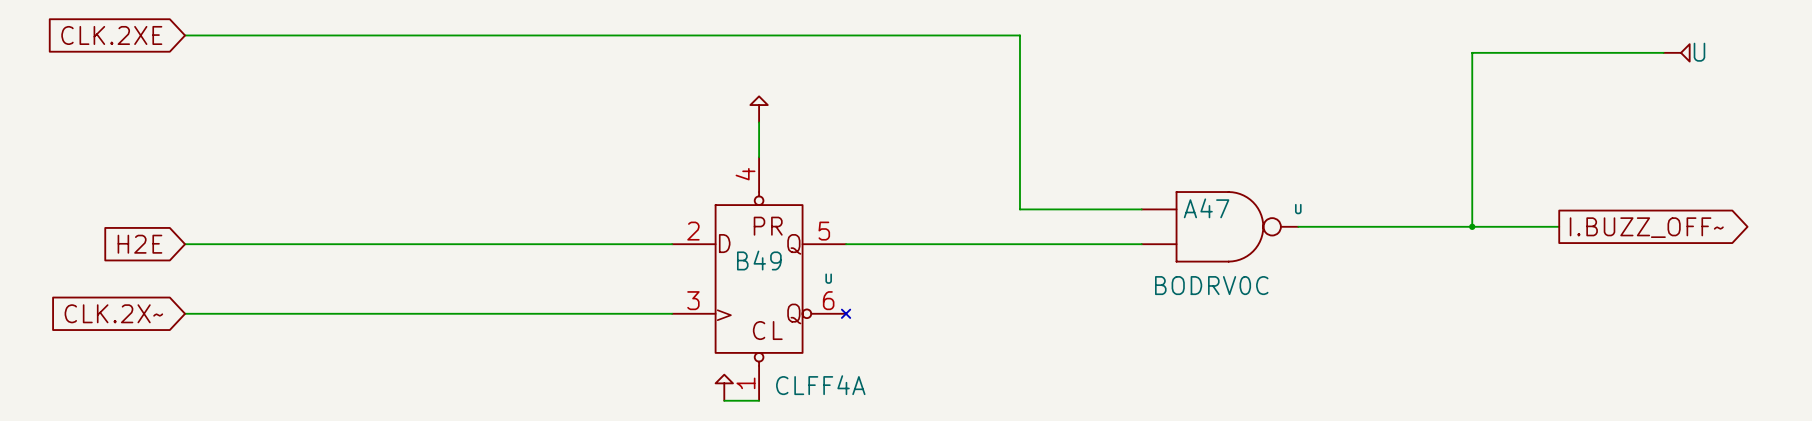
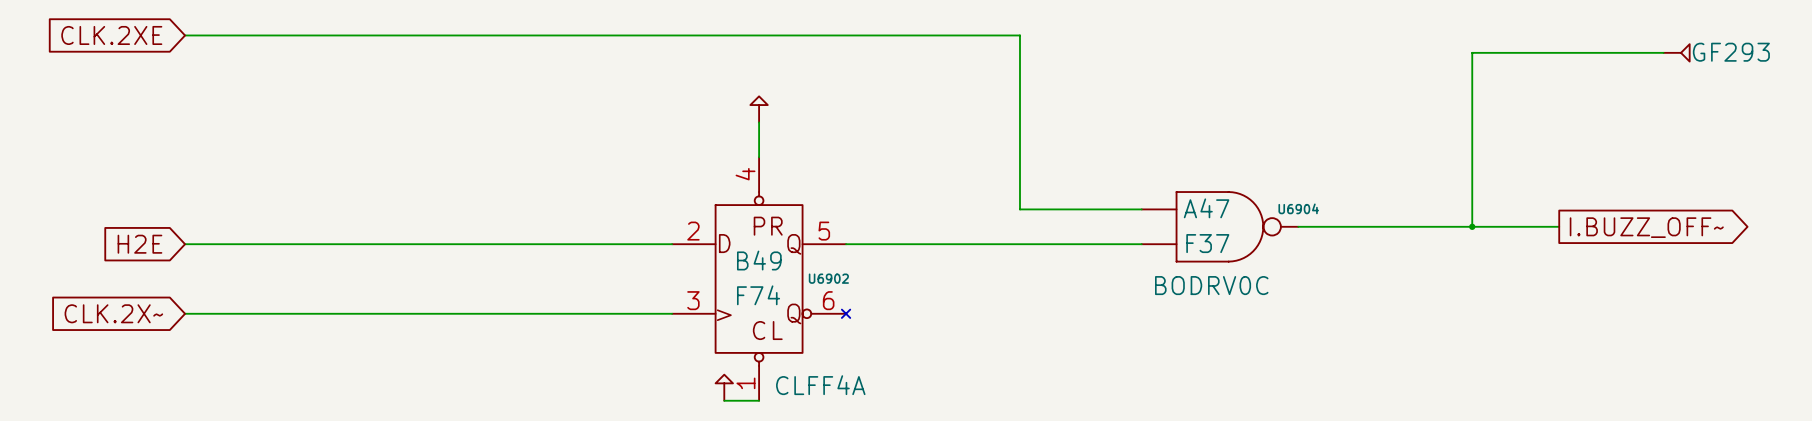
U name: U (1699, 52) -> GF293 (1731, 52)
U name: U (1298, 209) -> U6904 (1298, 208)
U value: none -> F37 (1207, 243)
U name: U (828, 278) -> U6902 (828, 278)
U value: none -> F74 (758, 295)

